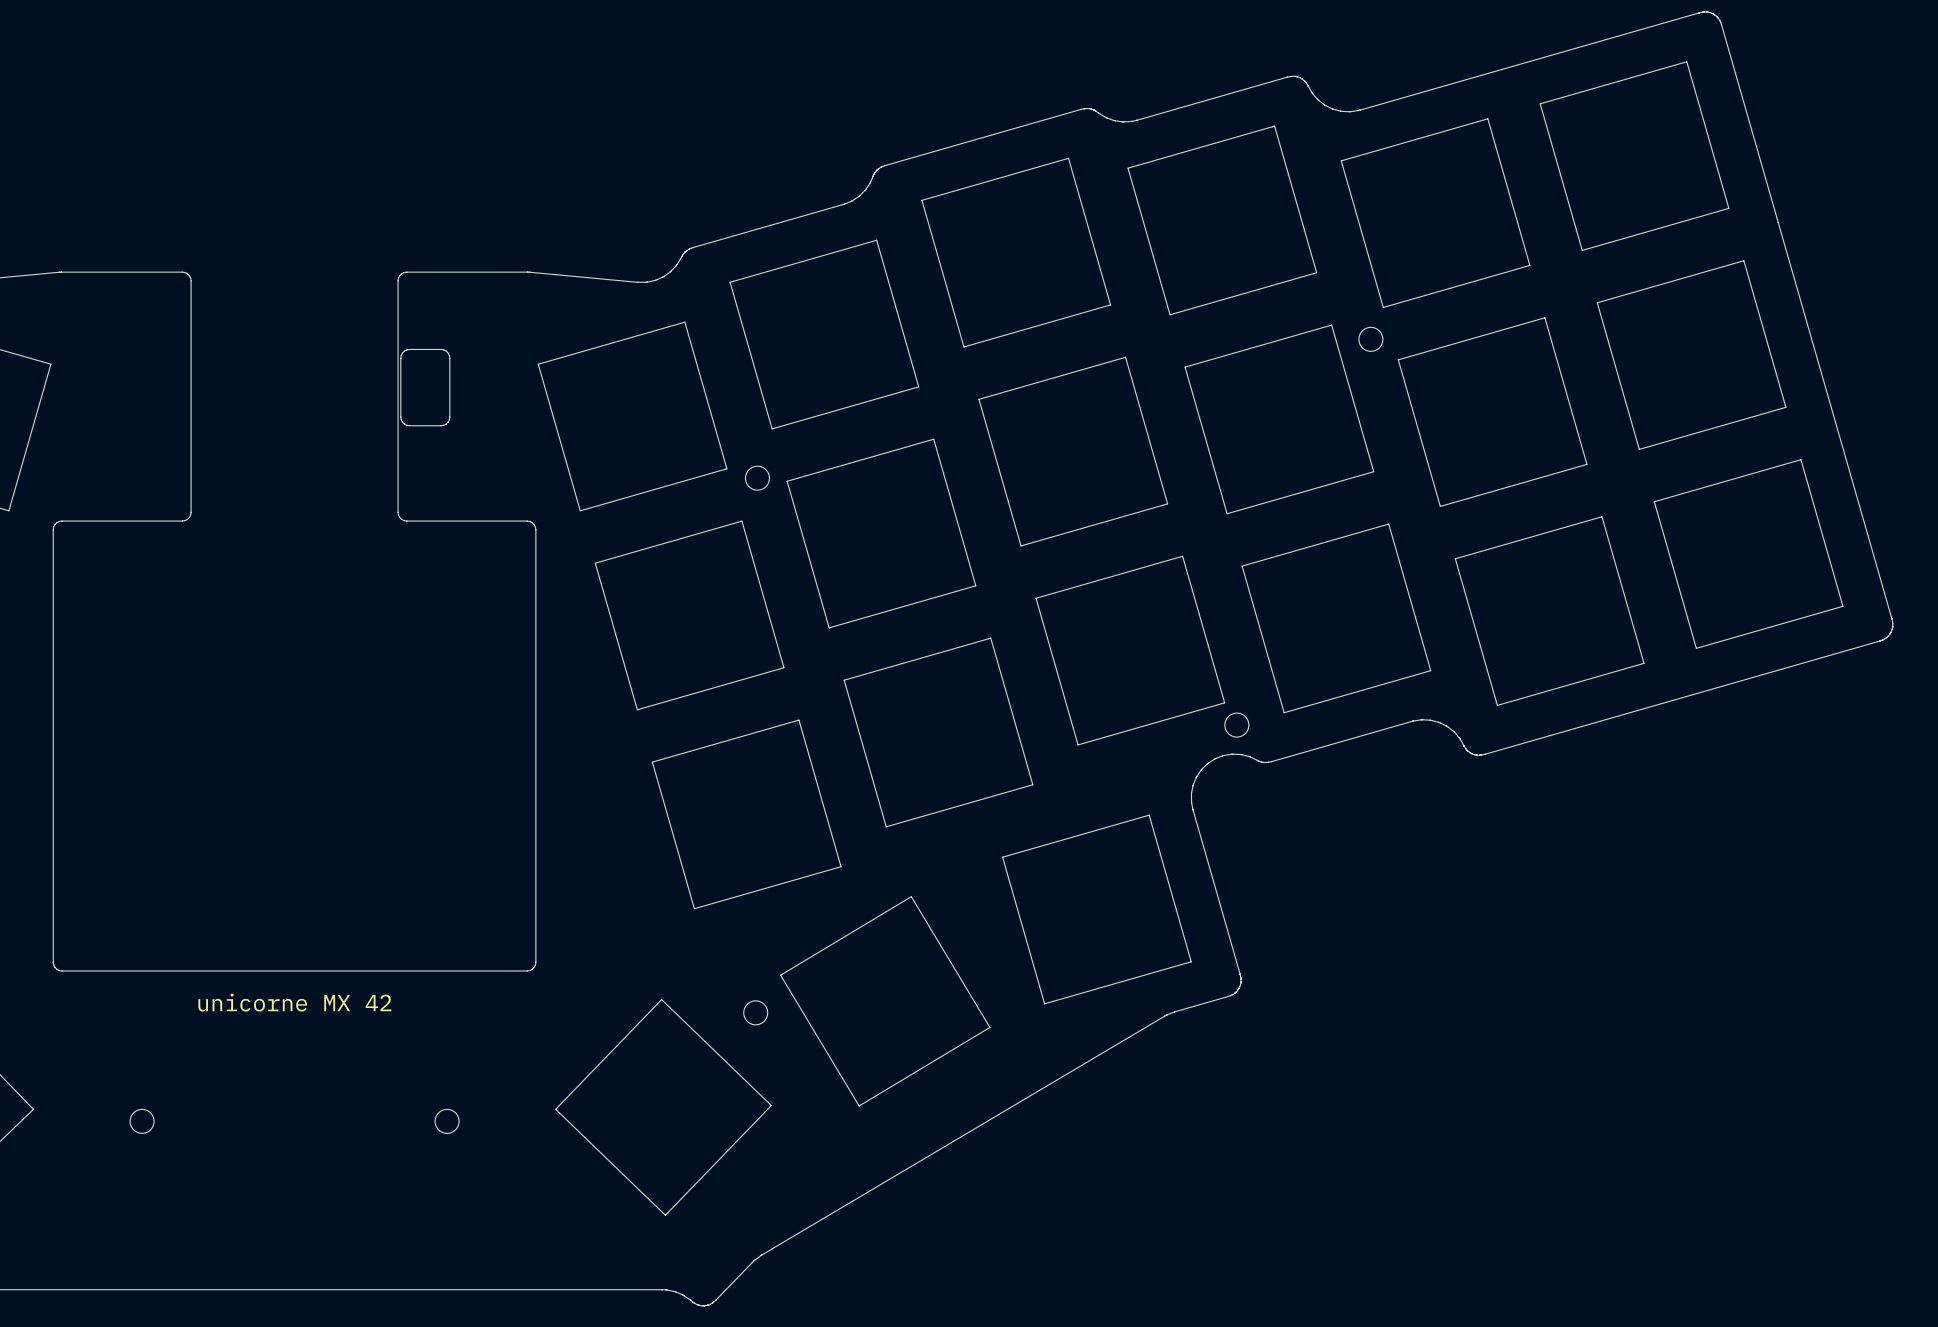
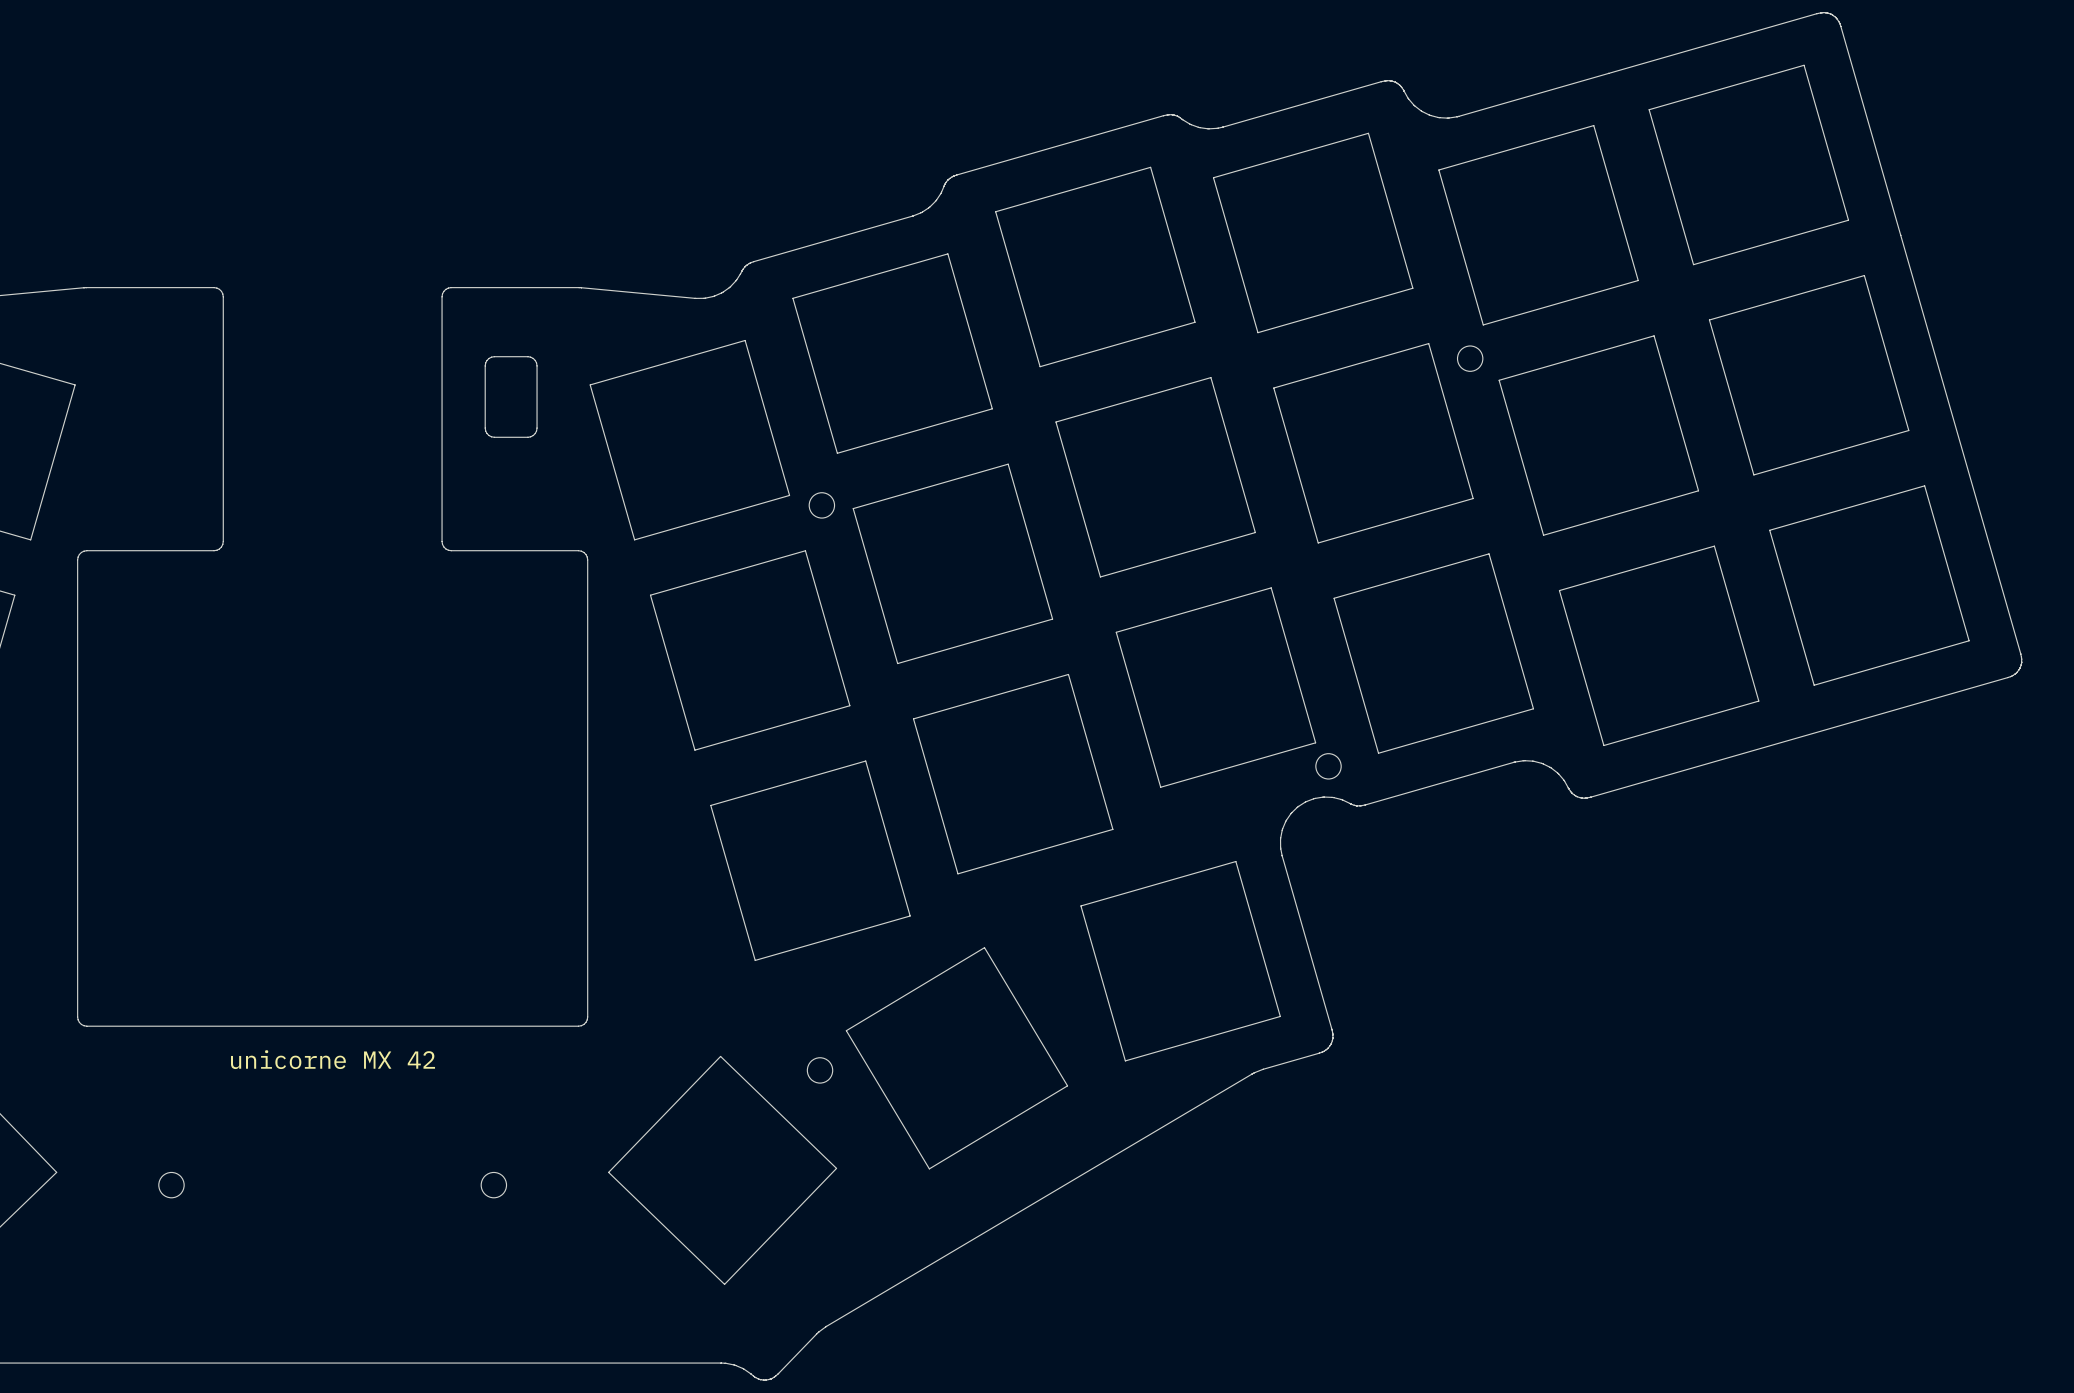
board edge: (409, 349) (404, 351) (400, 358) (401, 419) (404, 424) (409, 425) (443, 425) (448, 422) (449, 417) (449, 355) (446, 351) (441, 349) (409, 349) -> (494, 356) (489, 358) (485, 365) (485, 430) (489, 435) (494, 437) (530, 436) (535, 433) (537, 428) (536, 363) (533, 358) (527, 356) (494, 356)

